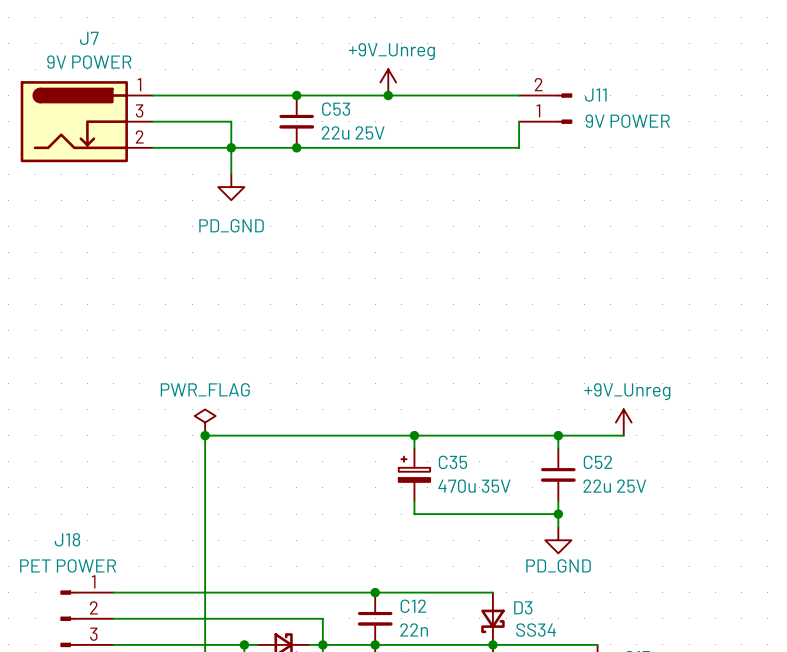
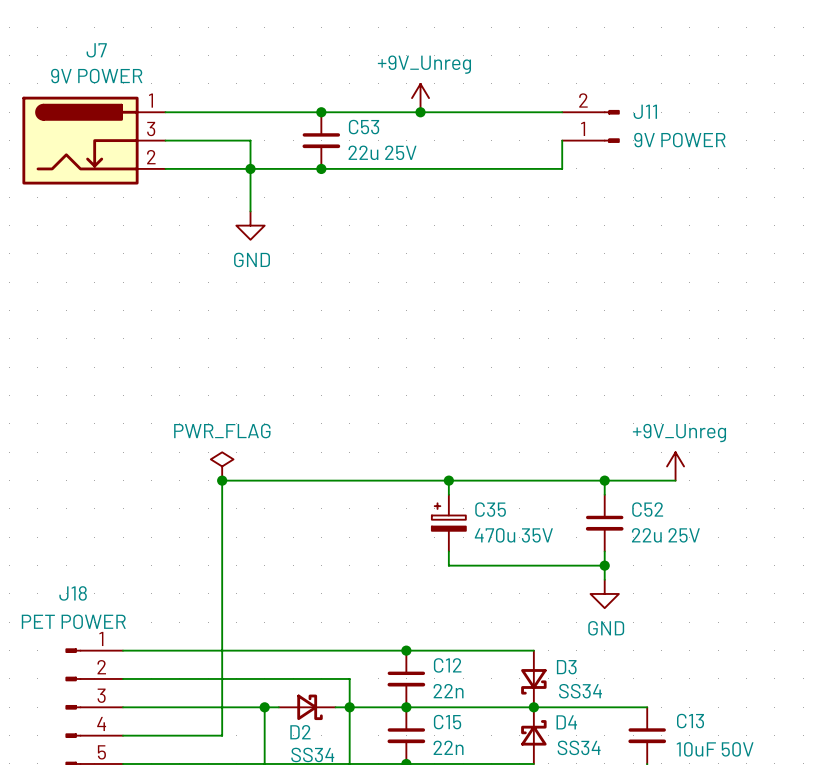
power symbol: PD_GND (231, 187) -> none
power symbol: none -> GND (250, 225)
power symbol: PD_GND (558, 540) -> GND (604, 593)

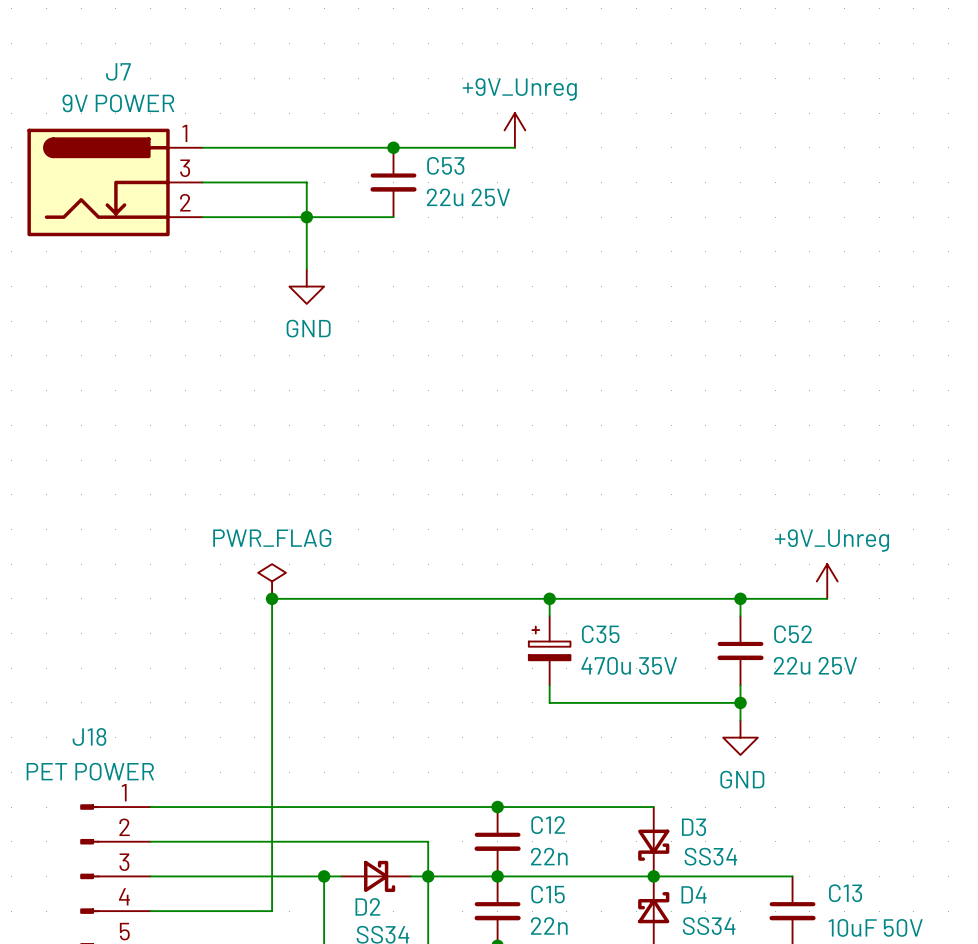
wire: (420, 112) (562, 112) -> none
junction: (420, 112) -> none
J11: 9V POWER (590, 126) -> none
wire: (562, 140) (562, 168) (321, 168) -> none
junction: (321, 168) -> none

